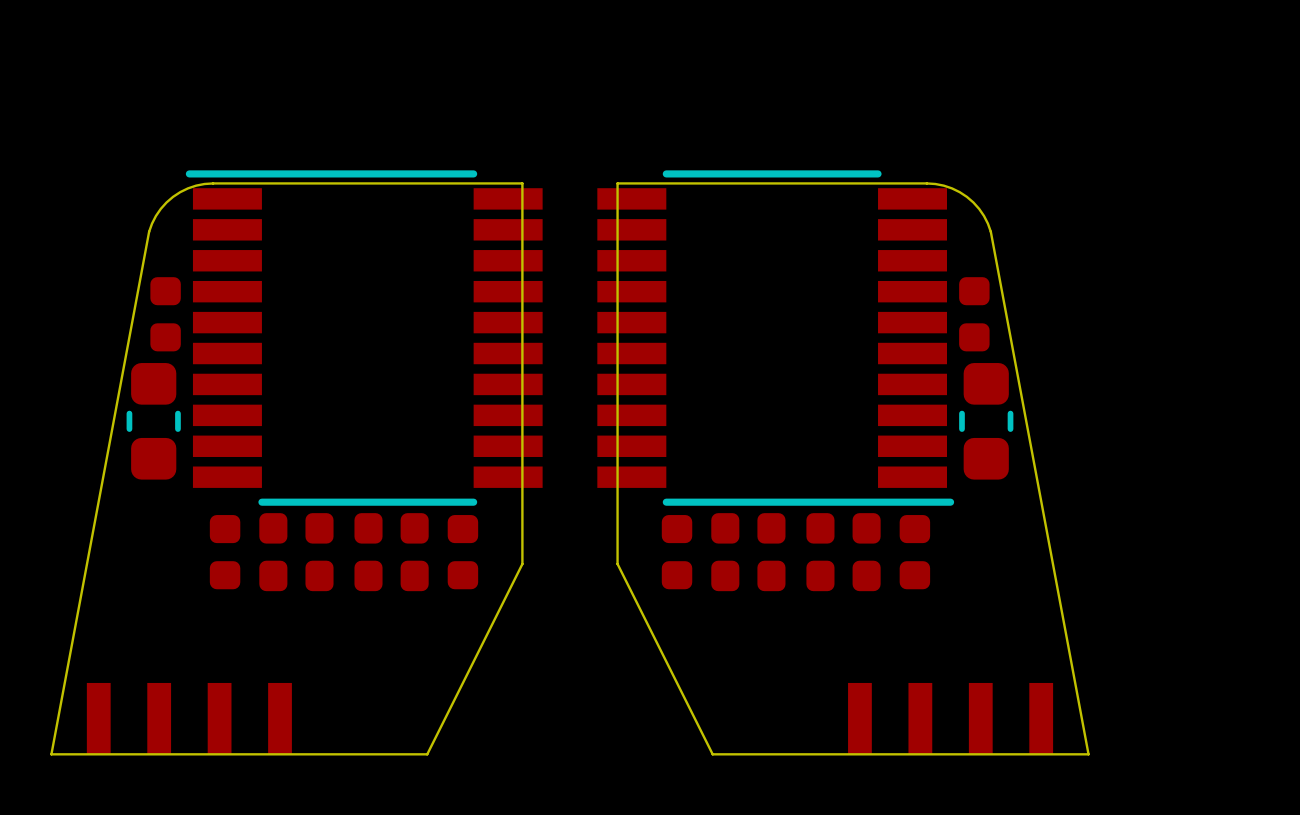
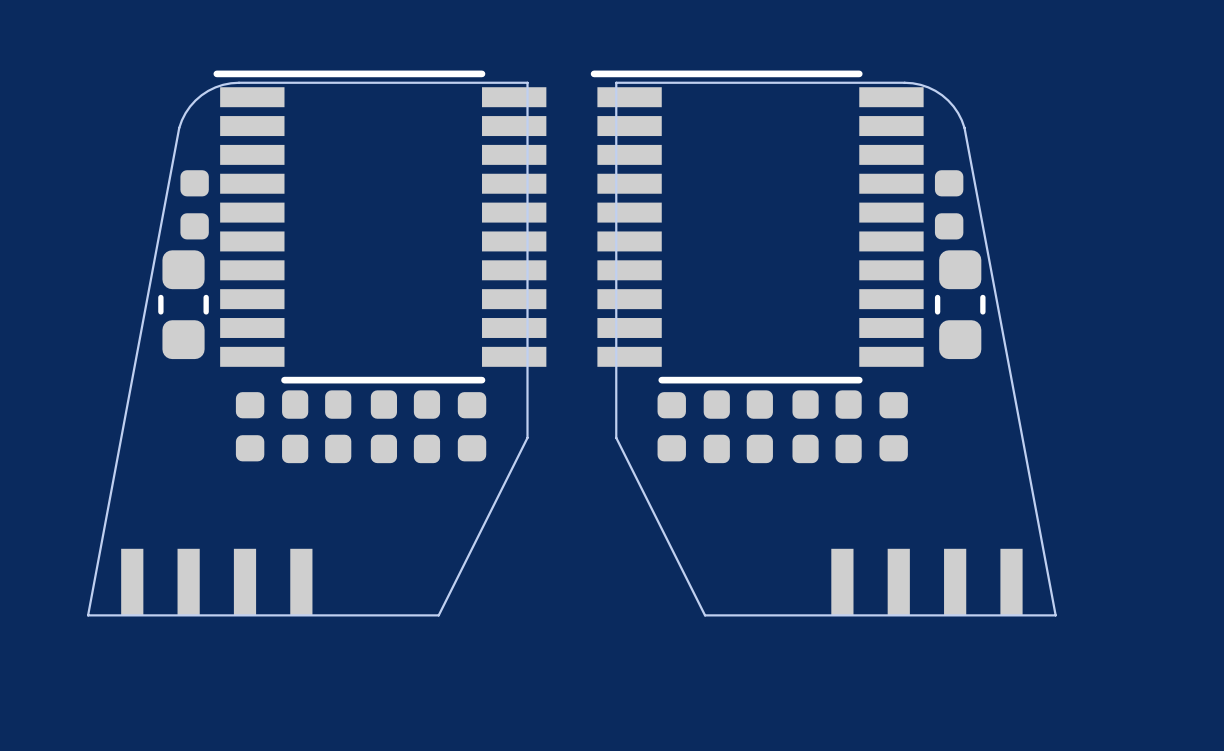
part rotation: 0° (775, 338) -> 180° (757, 227)

